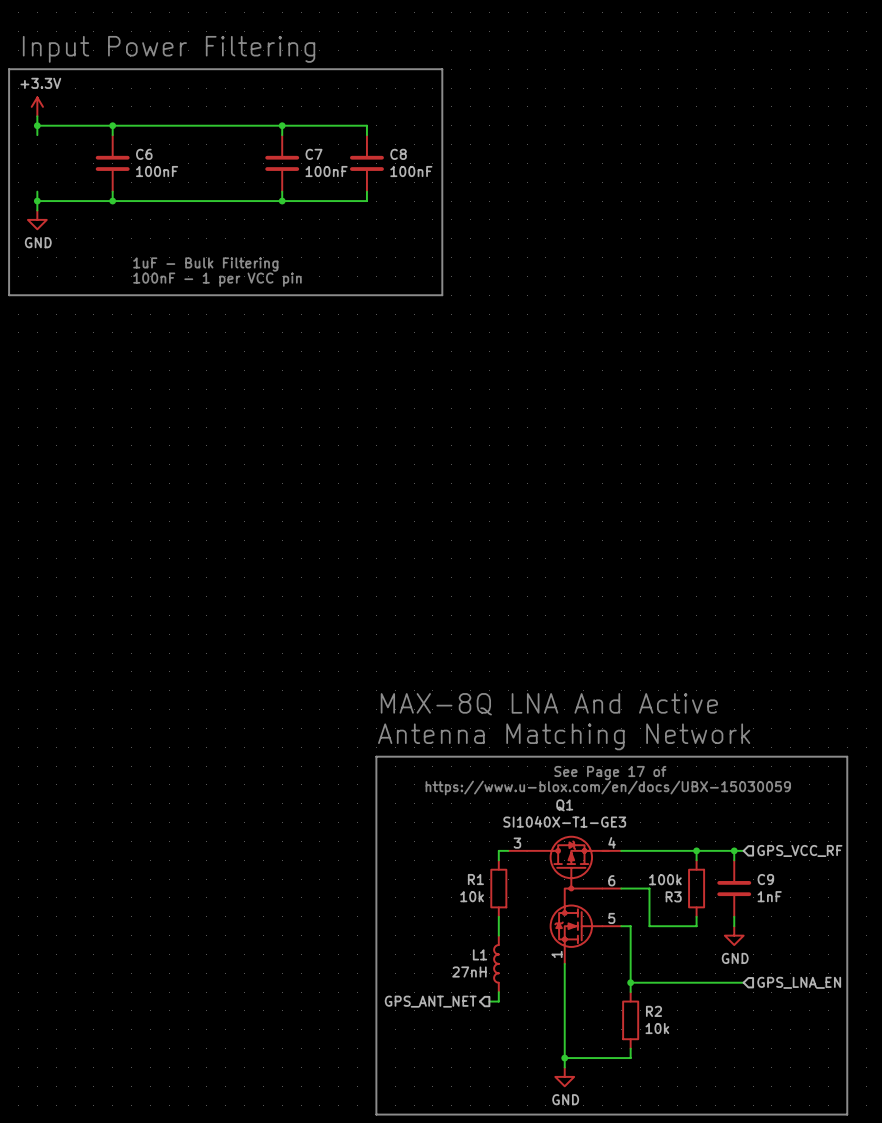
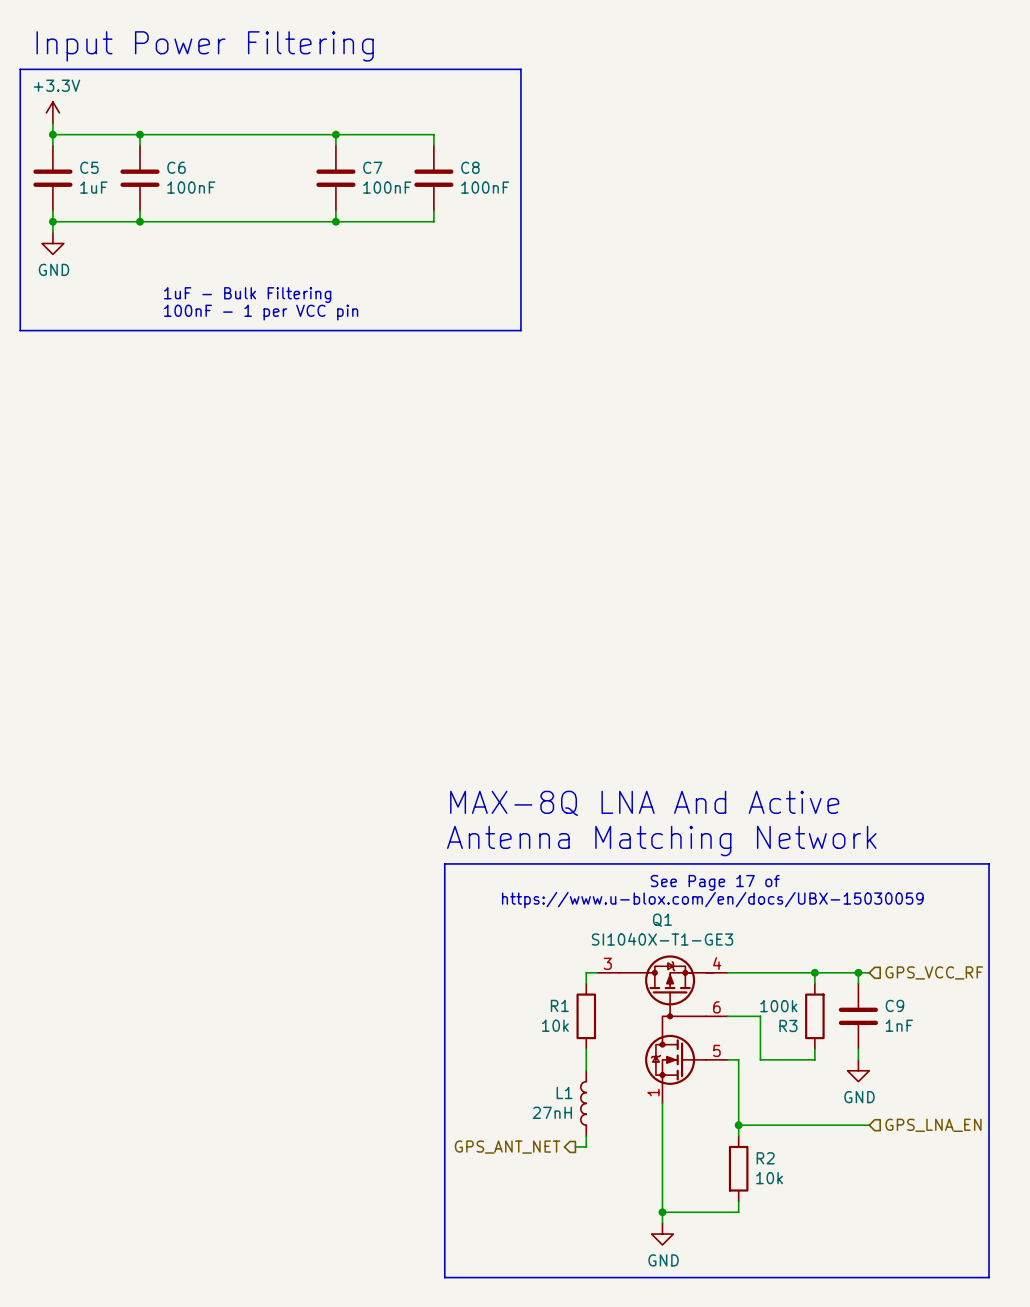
C5: none -> 1uF (52, 178)

